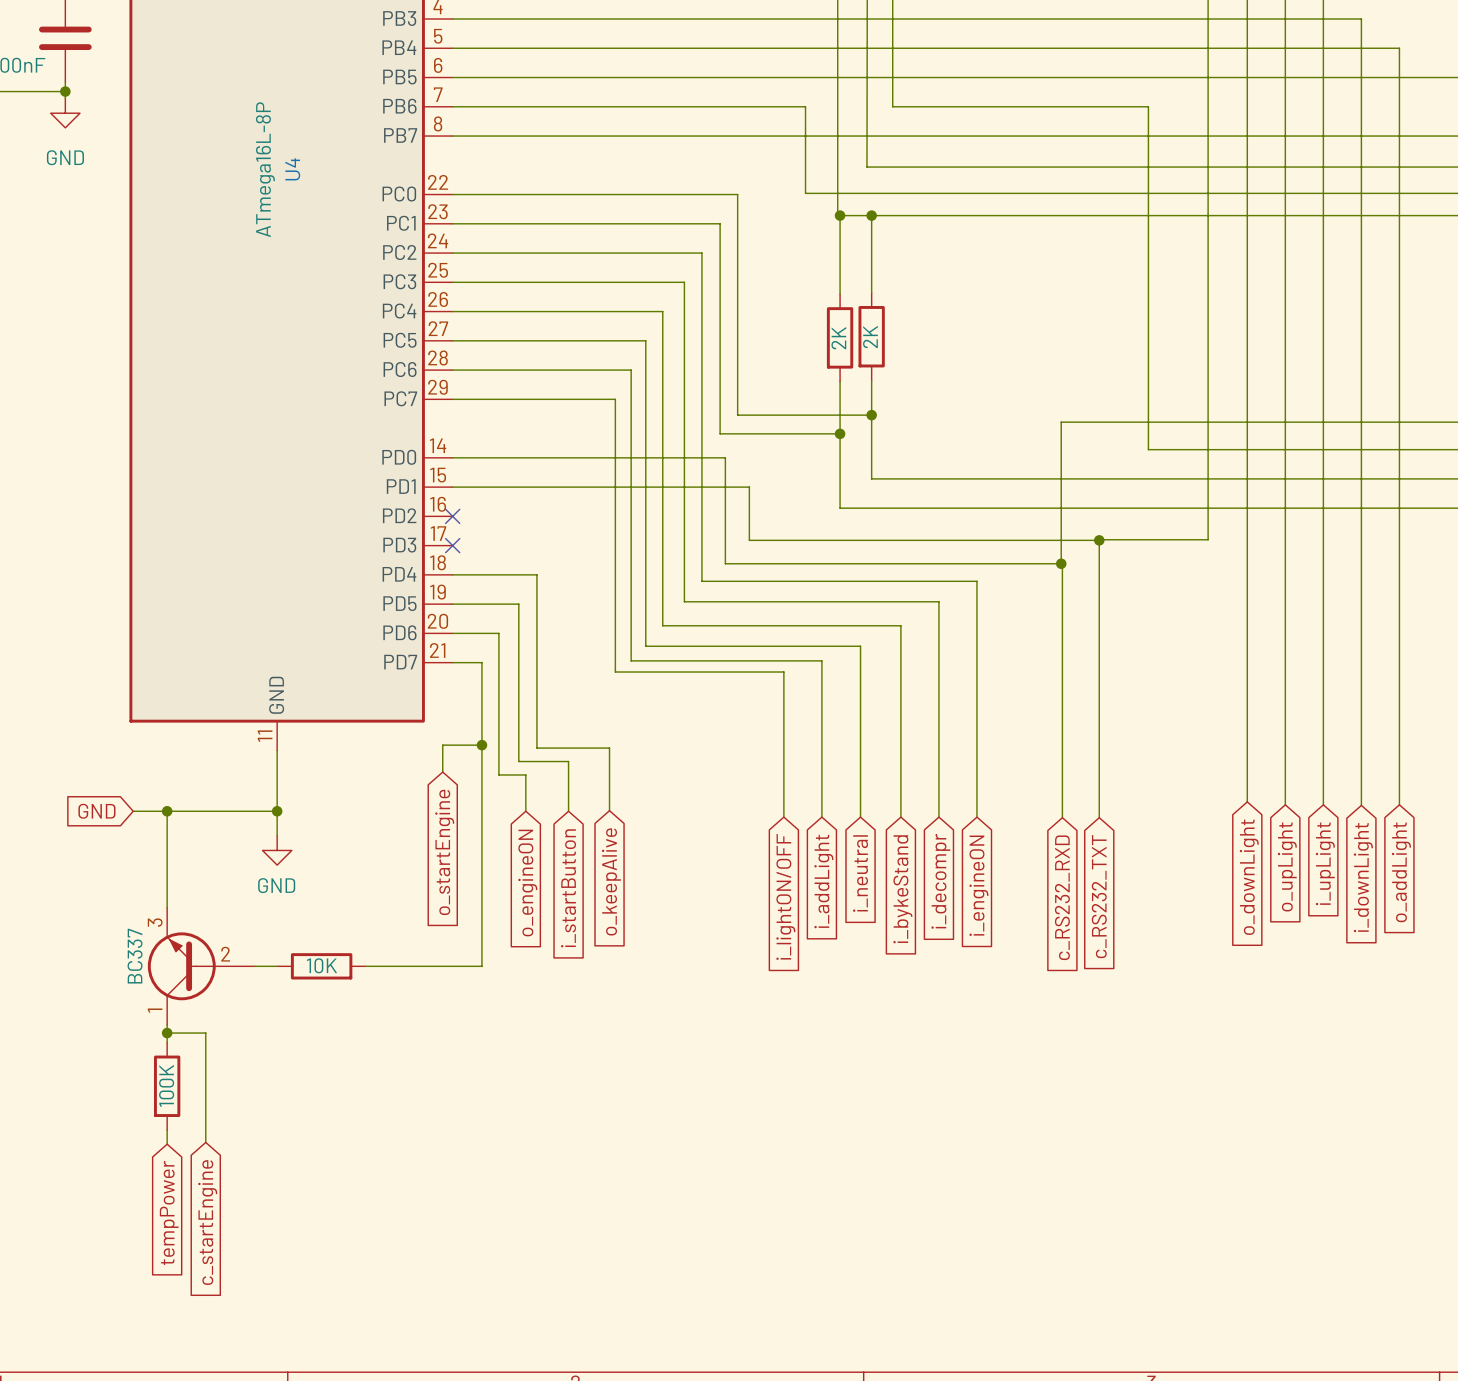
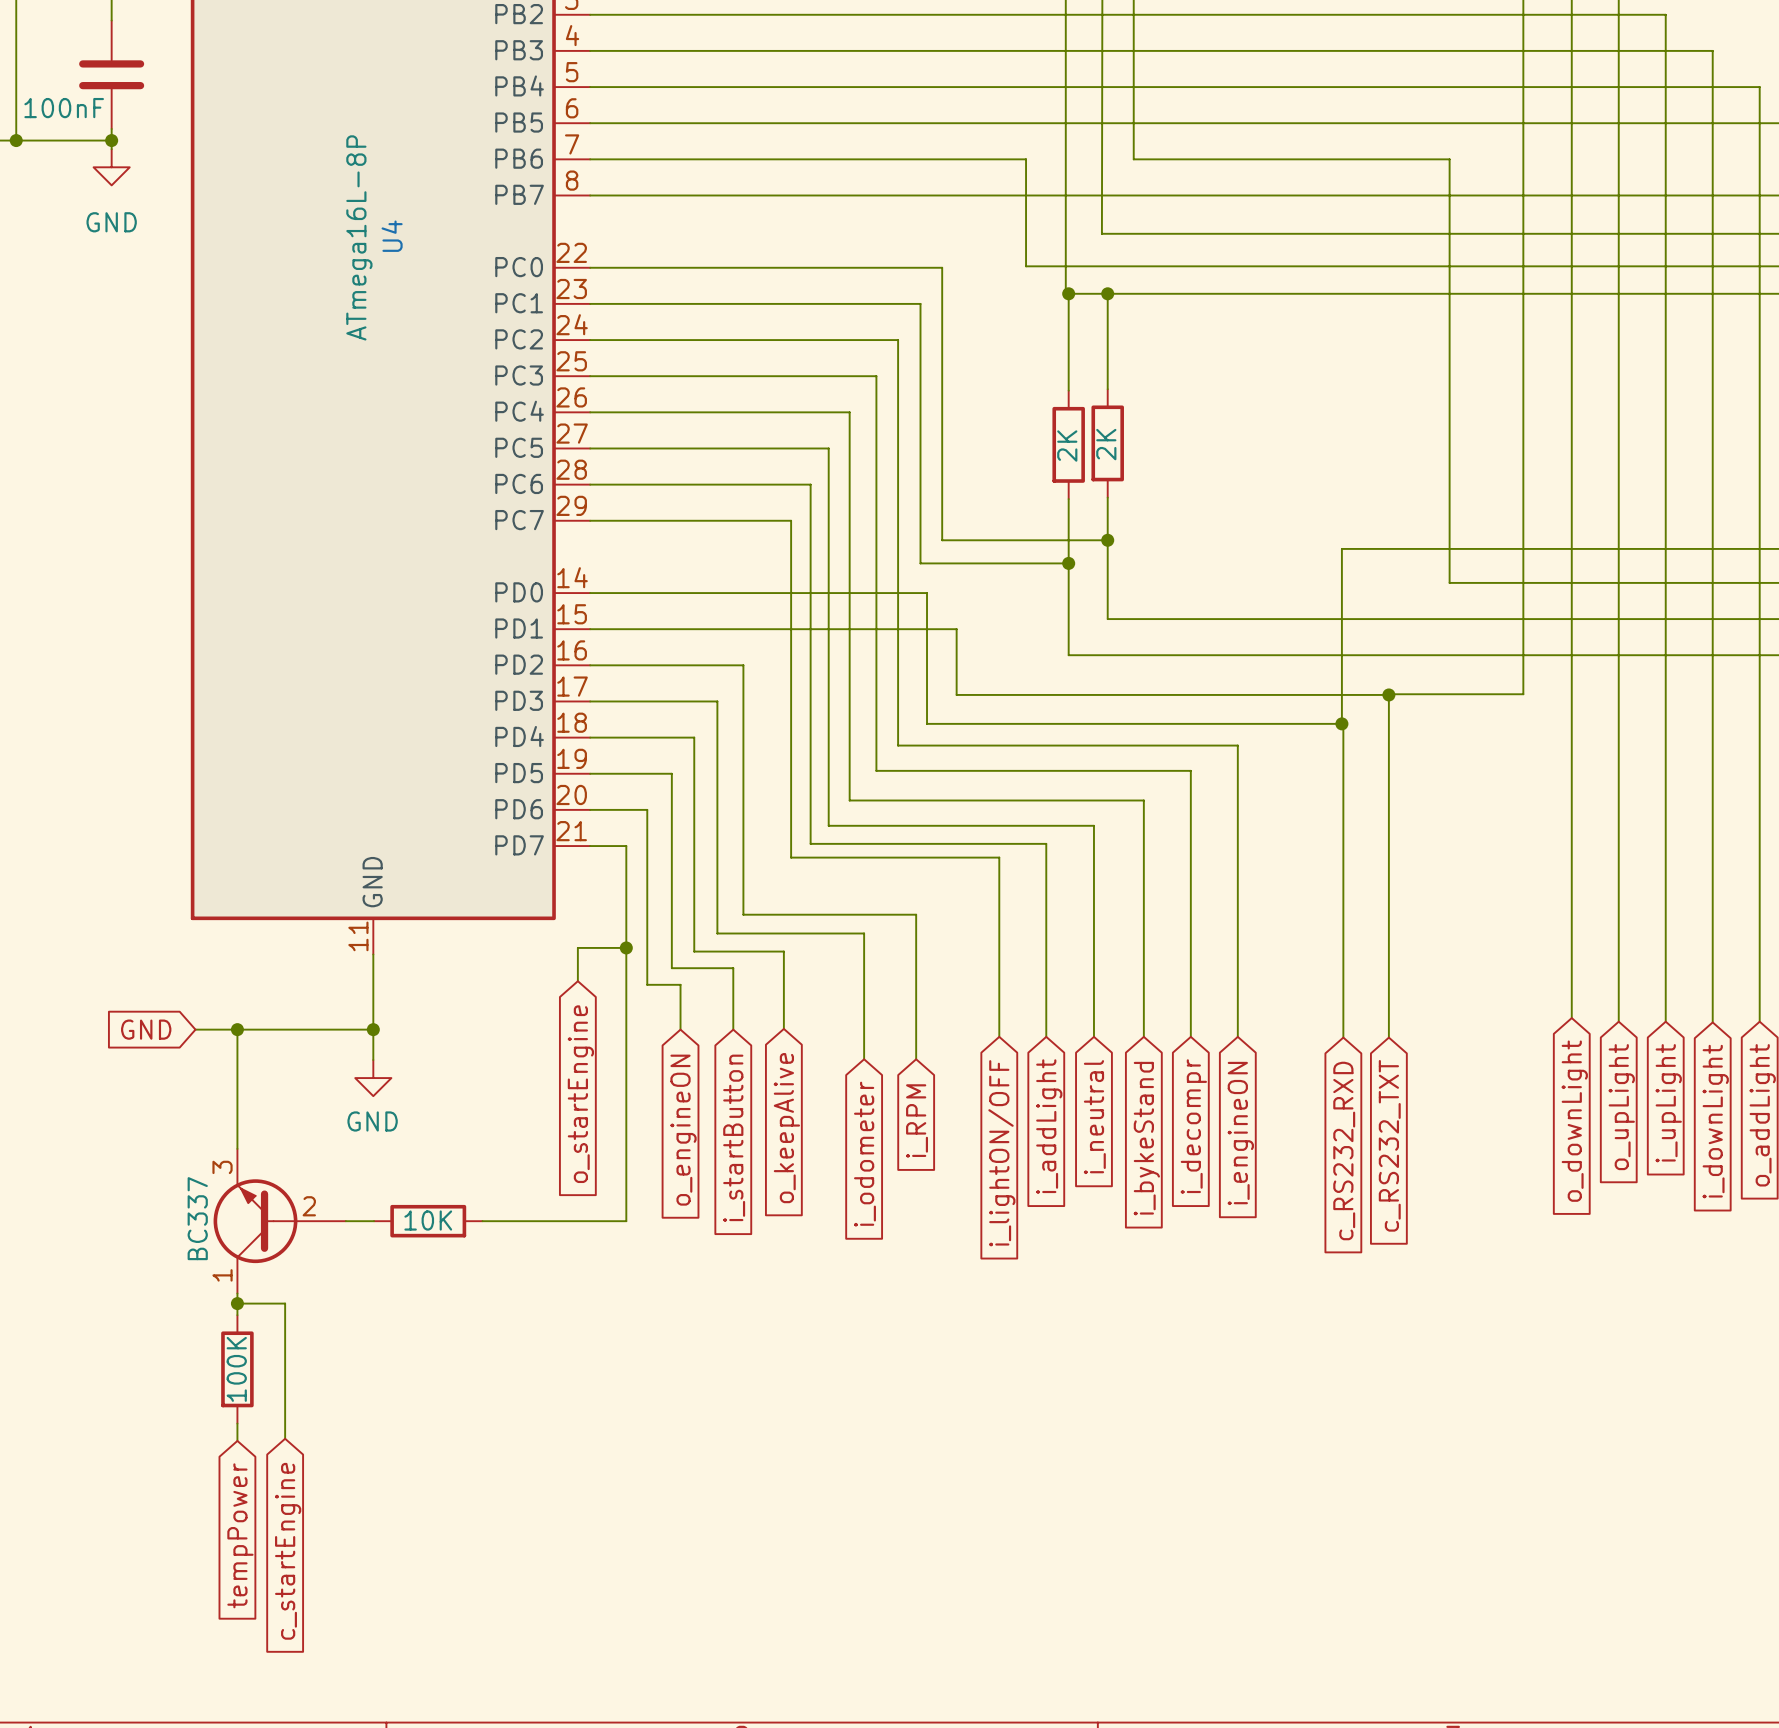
wire: none -> (590, 665) (743, 665) (743, 914) (916, 914) (916, 1059)
no-connect mark: (452, 516) -> none
wire: none -> (590, 701) (717, 701) (717, 933) (864, 933) (864, 1059)
no-connect mark: (452, 545) -> none
global label: none -> i_RPM (917, 1121)
global label: none -> i_odometer (864, 1154)

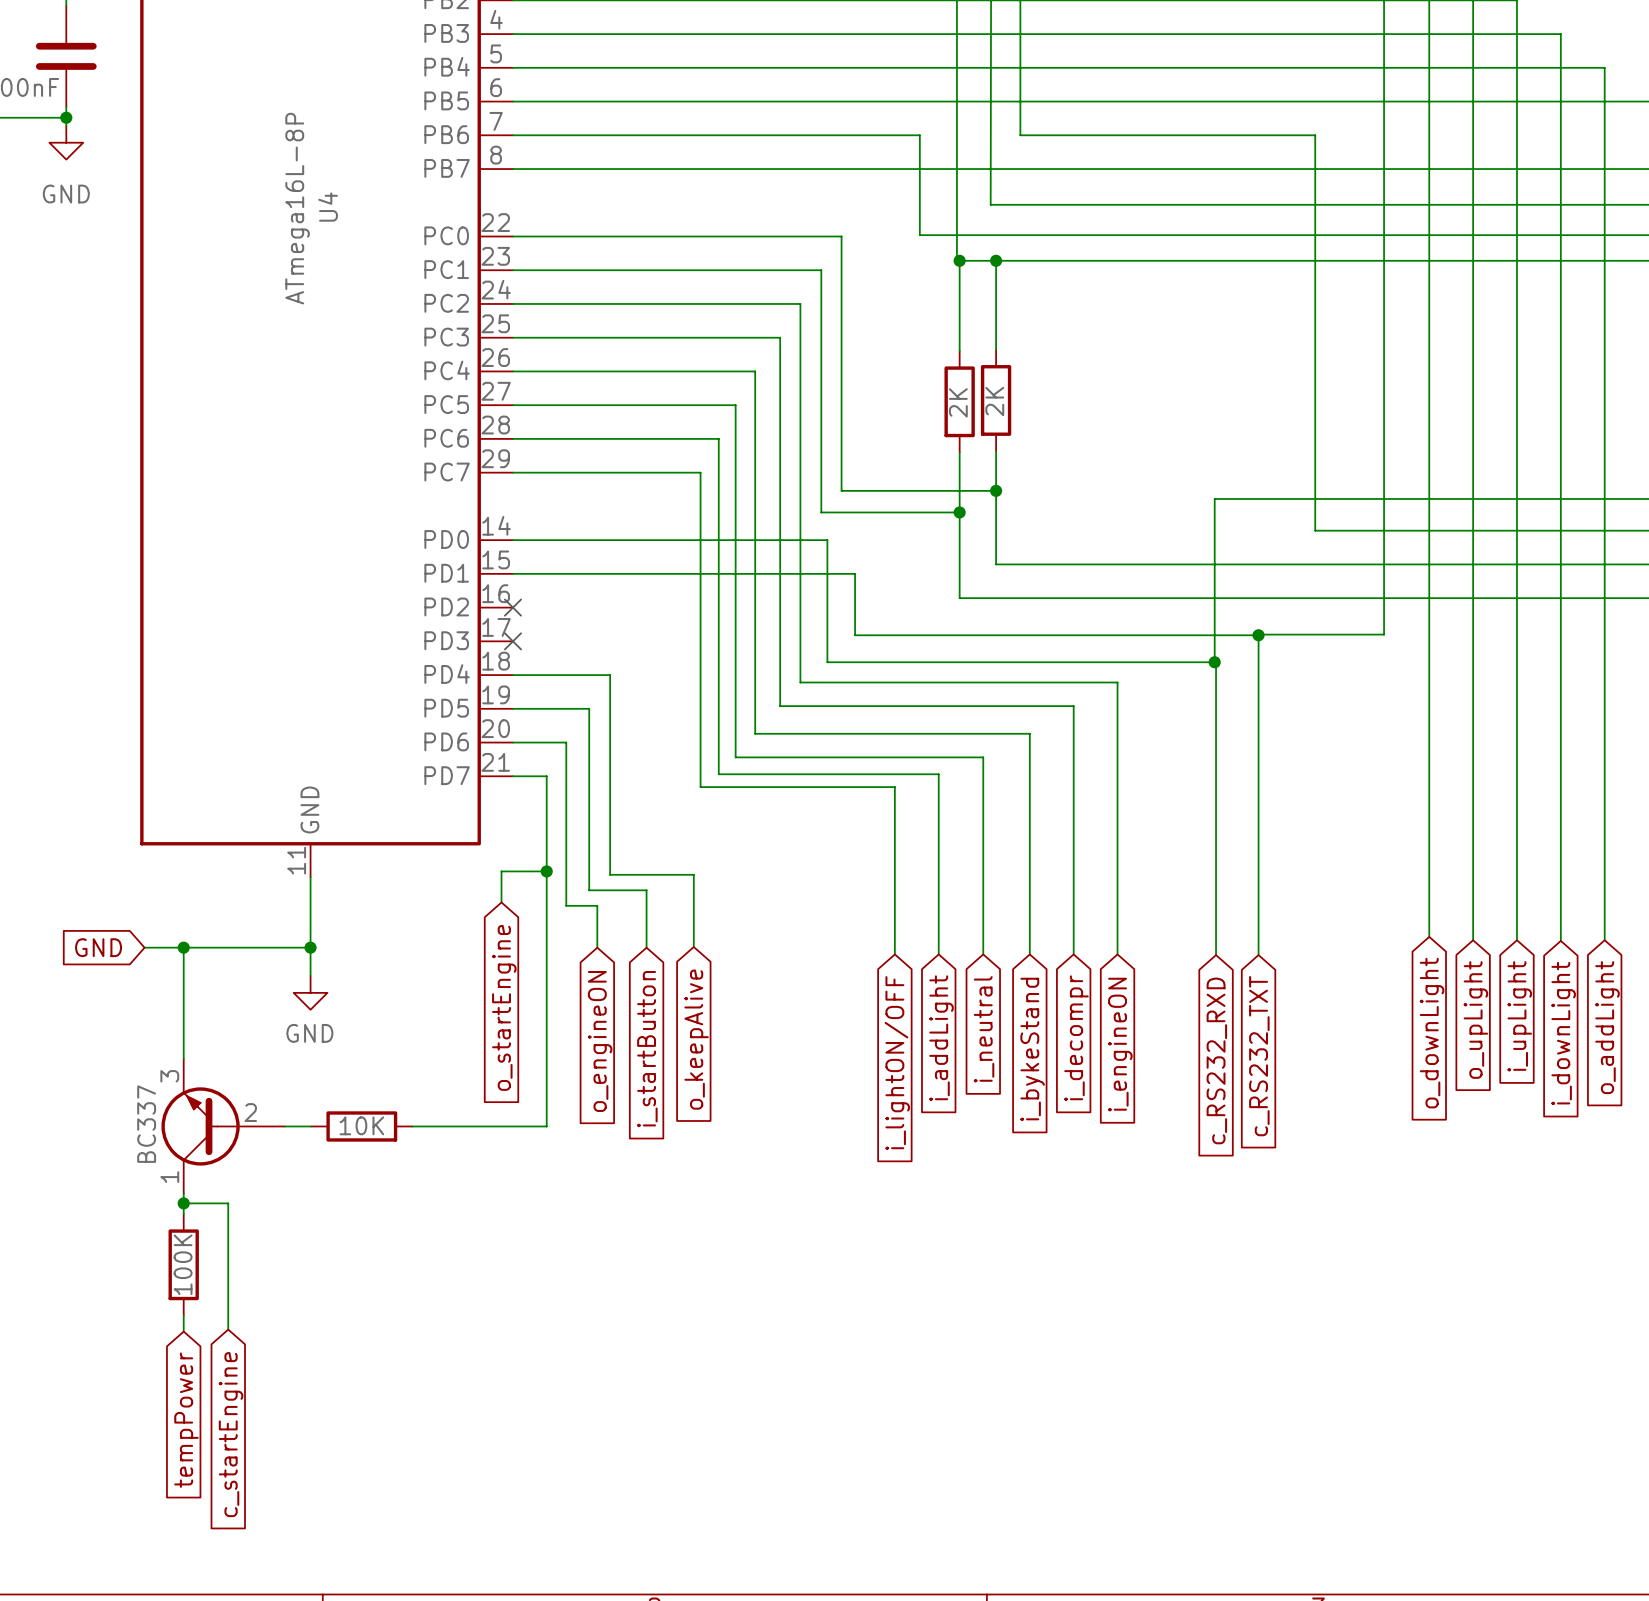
wire: (590, 665) (743, 665) (743, 914) (916, 914) (916, 1059) -> none
no-connect mark: none -> (512, 607)
wire: (590, 701) (717, 701) (717, 933) (864, 933) (864, 1059) -> none
no-connect mark: none -> (512, 641)
global label: i_RPM (917, 1121) -> none
global label: i_odometer (864, 1154) -> none

